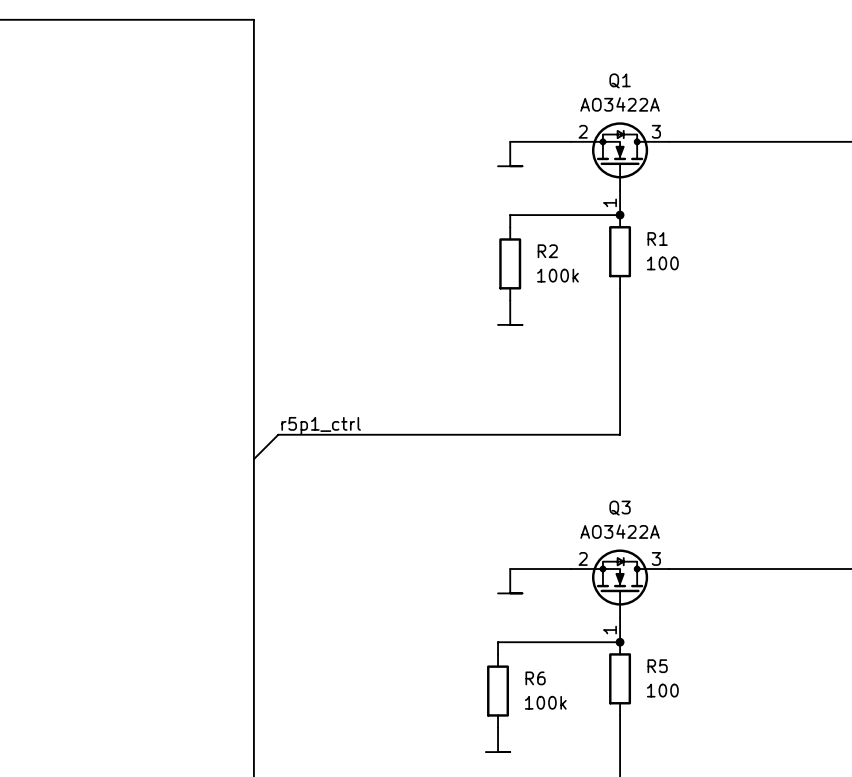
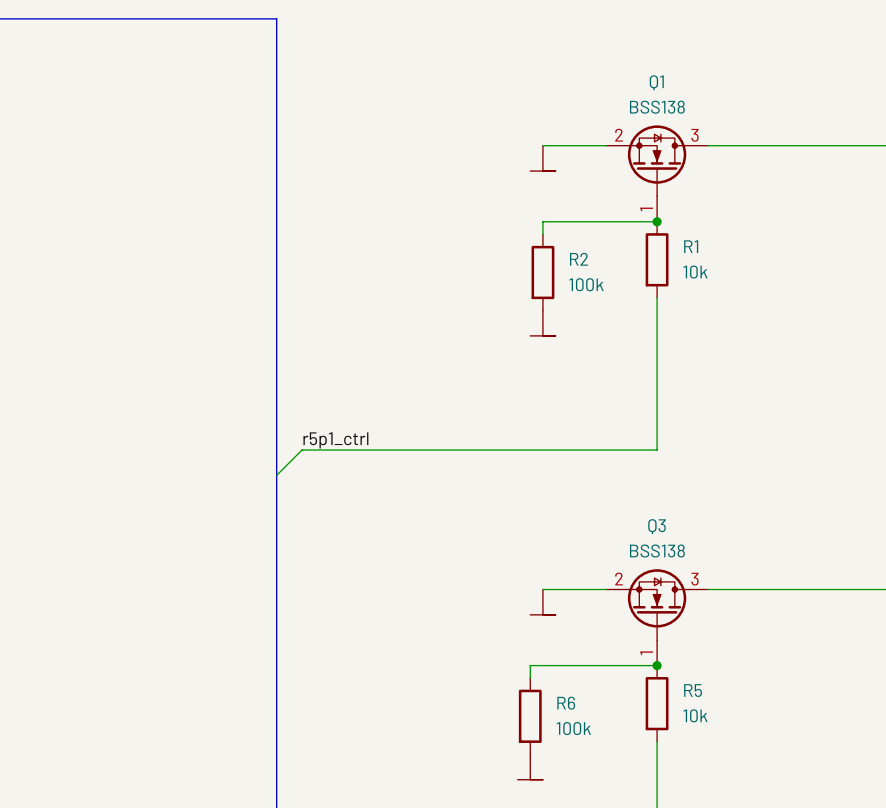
Q1 value: AO3422A (620, 104) -> BSS138 (657, 107)
R1 value: 100 (662, 263) -> 10k (695, 272)
Q3 value: AO3422A (620, 531) -> BSS138 (657, 550)
R5 value: 100 (662, 690) -> 10k (695, 715)

